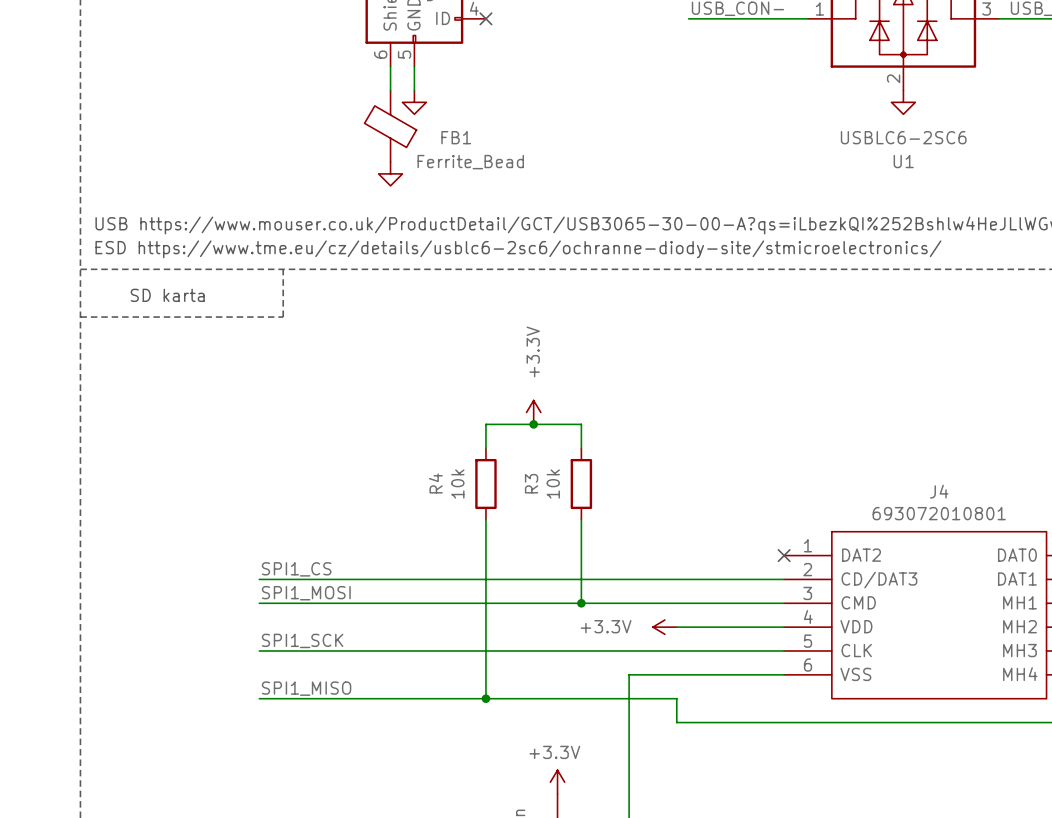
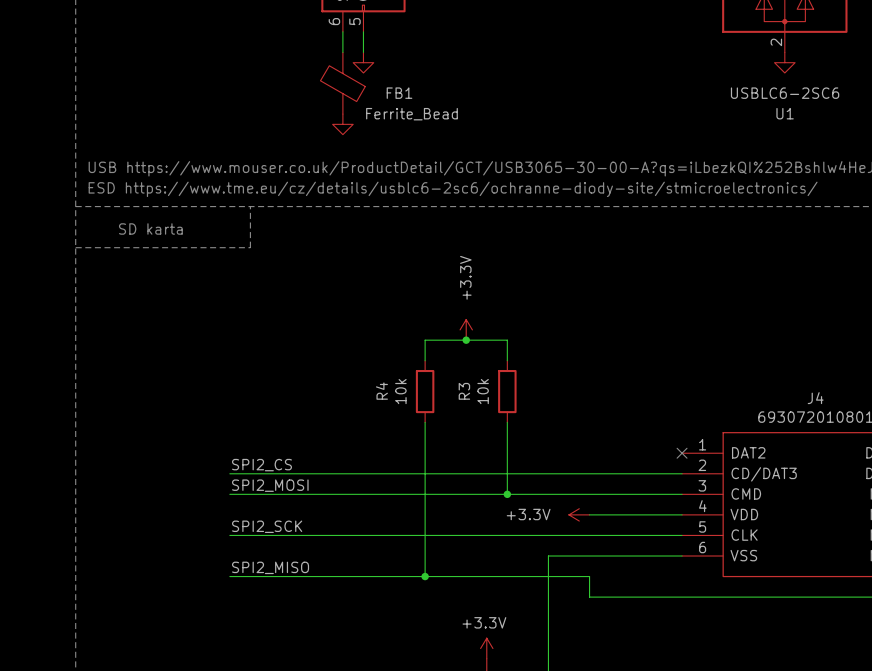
label: SPI1_CS (296, 569) -> SPI2_CS (261, 465)
label: SPI1_MOSI (306, 593) -> SPI2_MOSI (270, 485)
label: SPI1_SCK (302, 640) -> SPI2_SCK (267, 526)
label: SPI1_MISO (306, 688) -> SPI2_MISO (270, 567)

